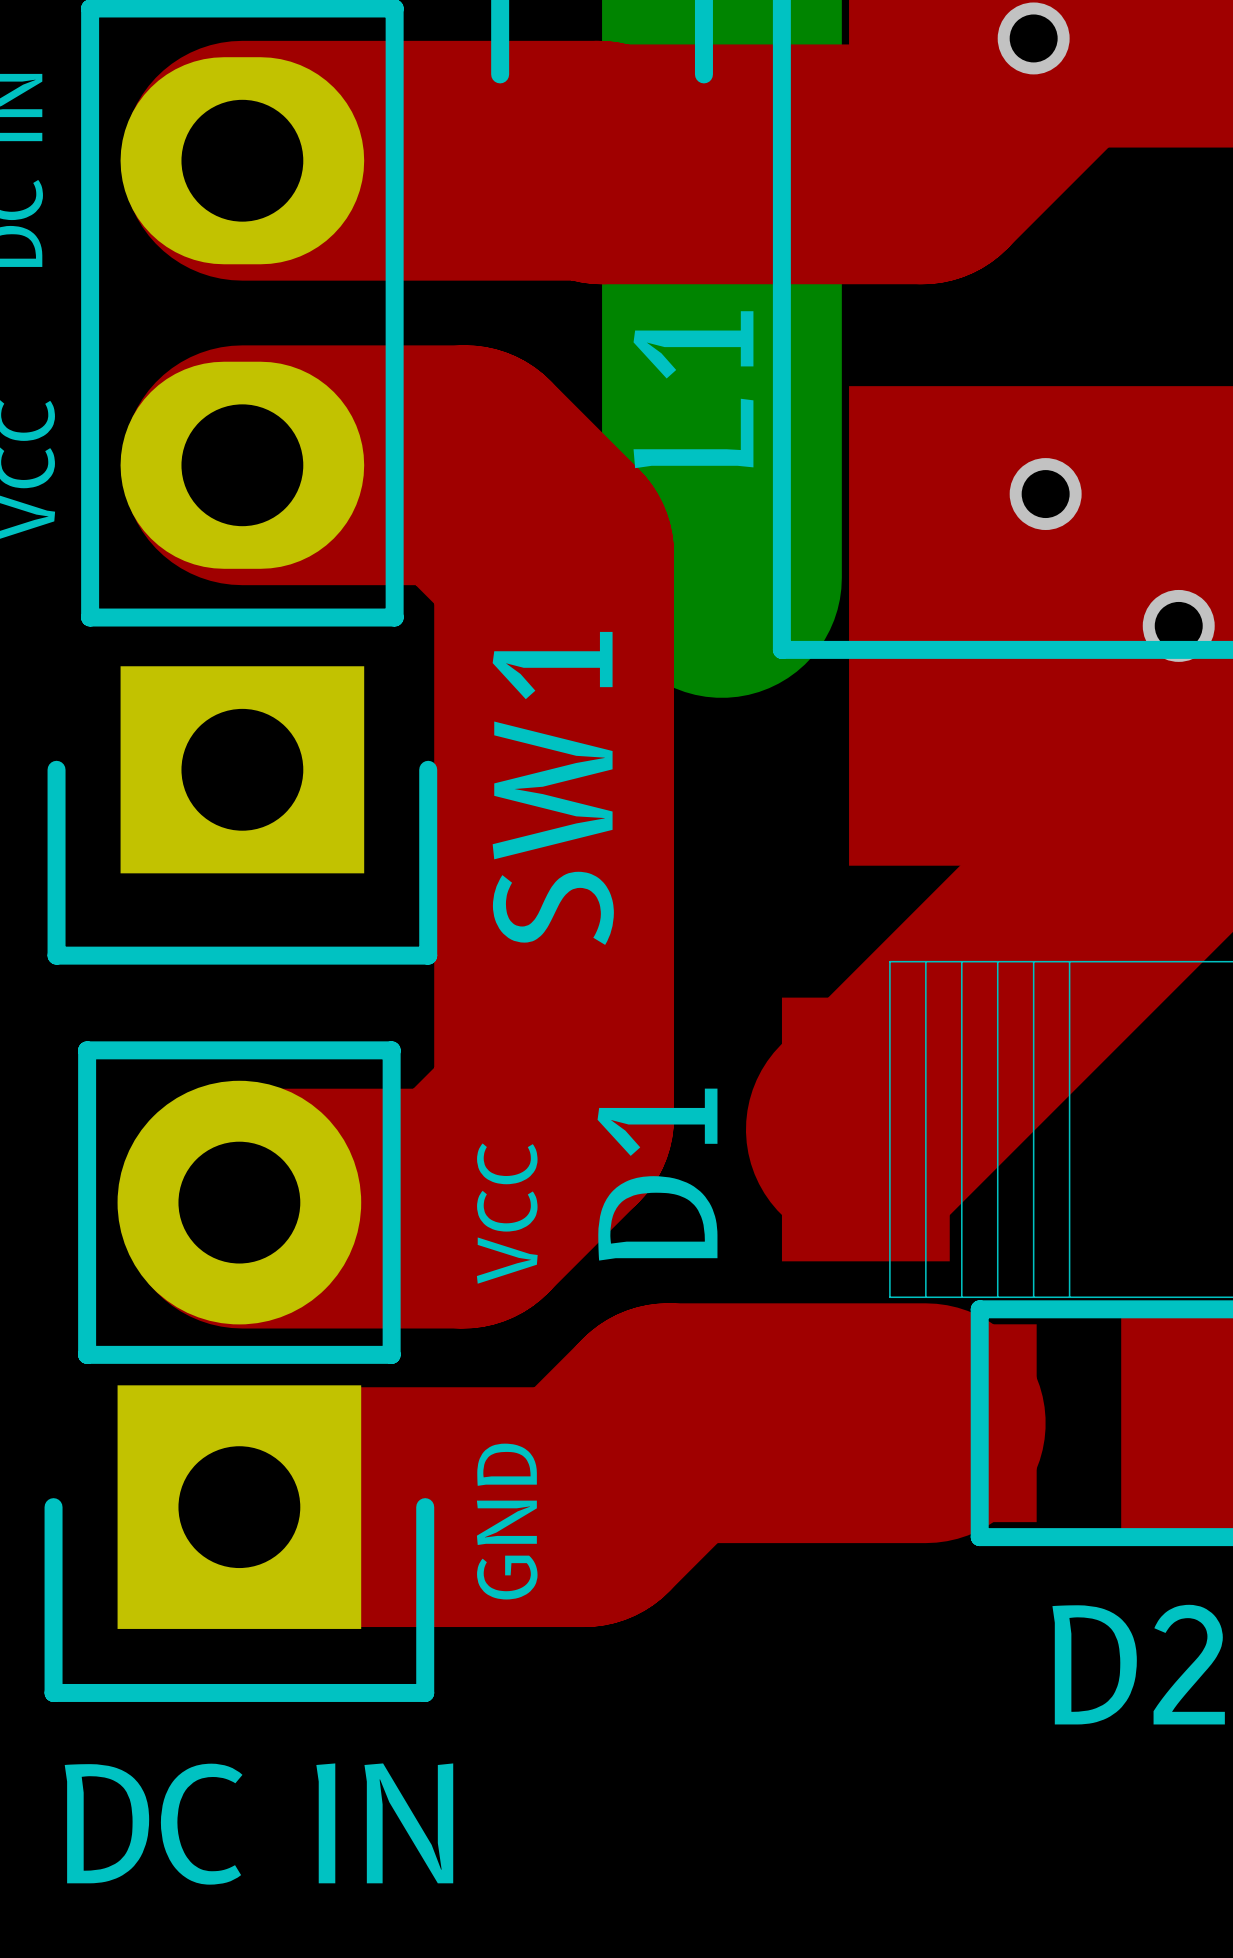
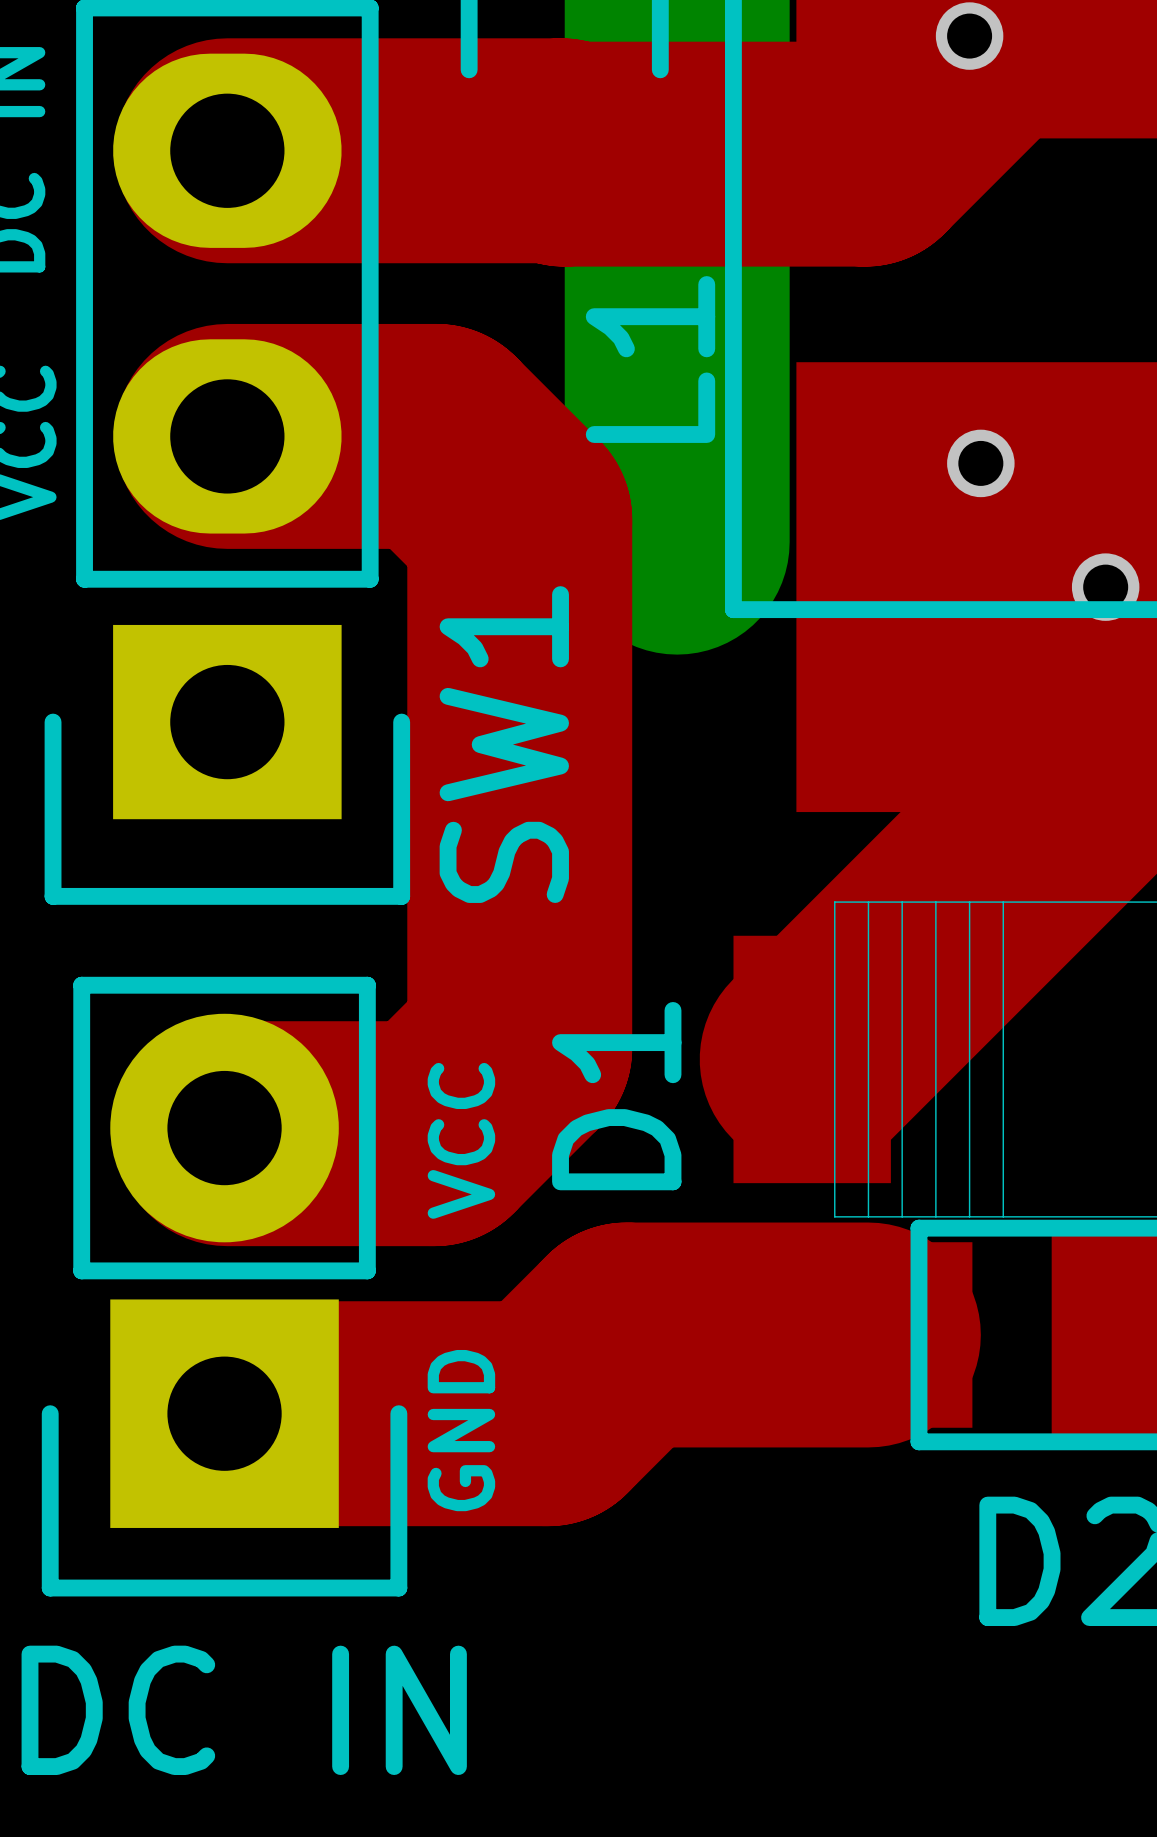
SW1 name position: SW1 (553, 788) -> SW1 (504, 744)
text position: VCC (507, 1213) -> VCC (461, 1140)
text position: GND (507, 1521) -> GND (461, 1430)

